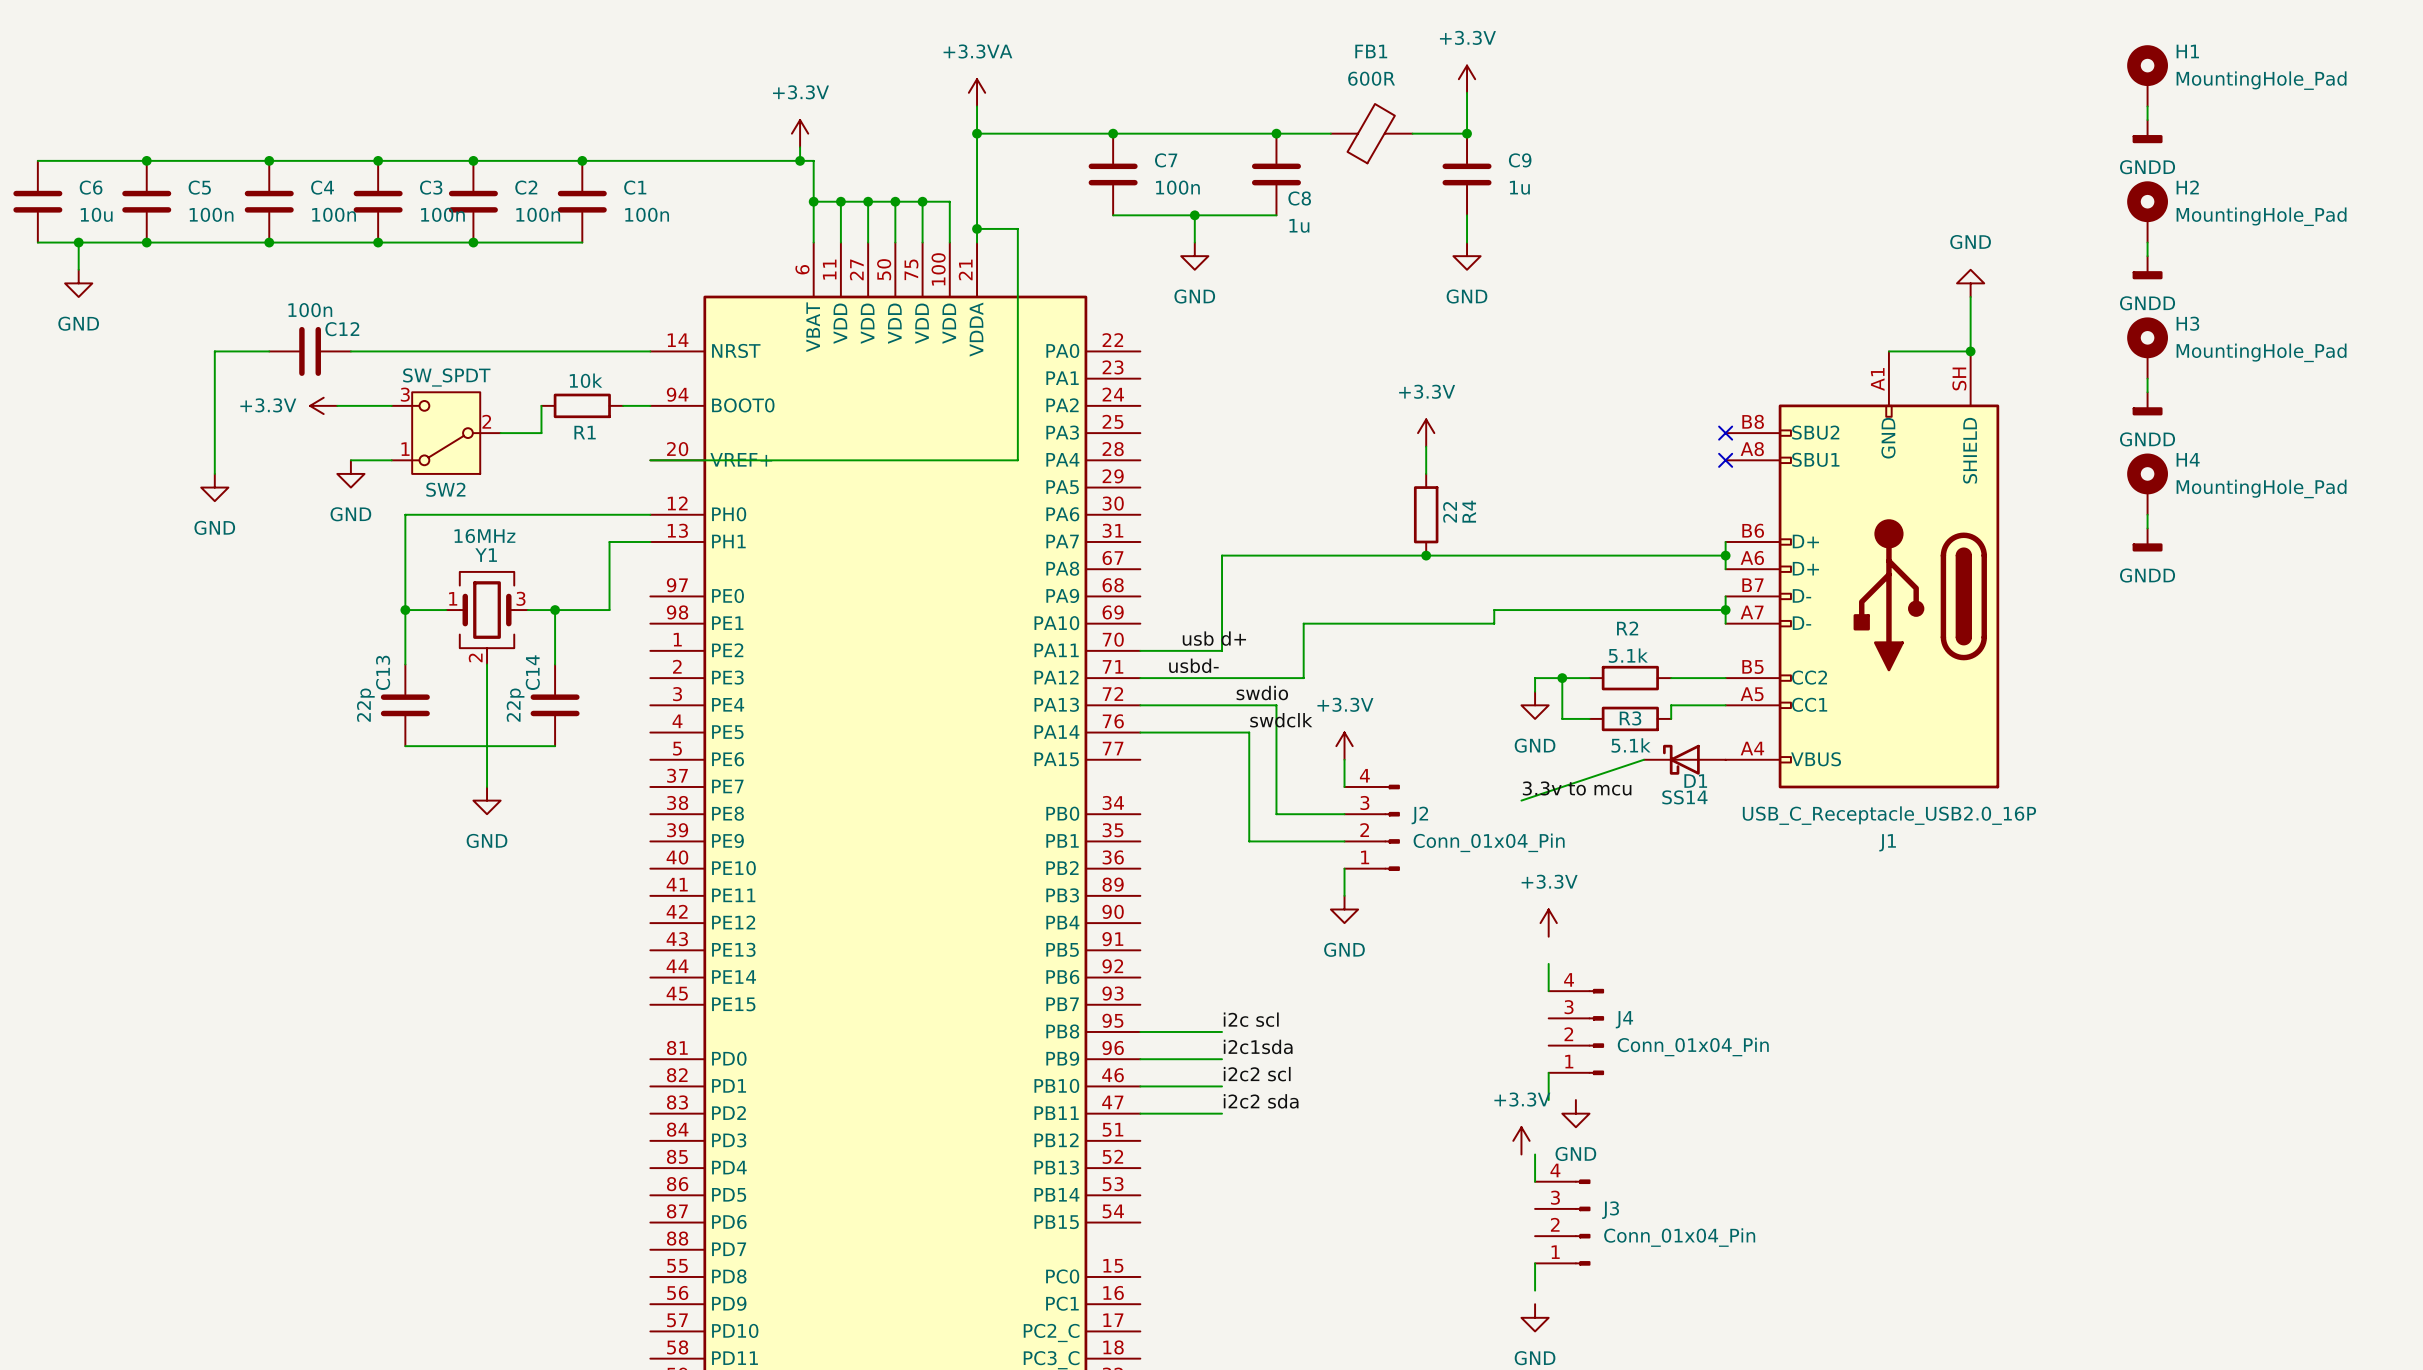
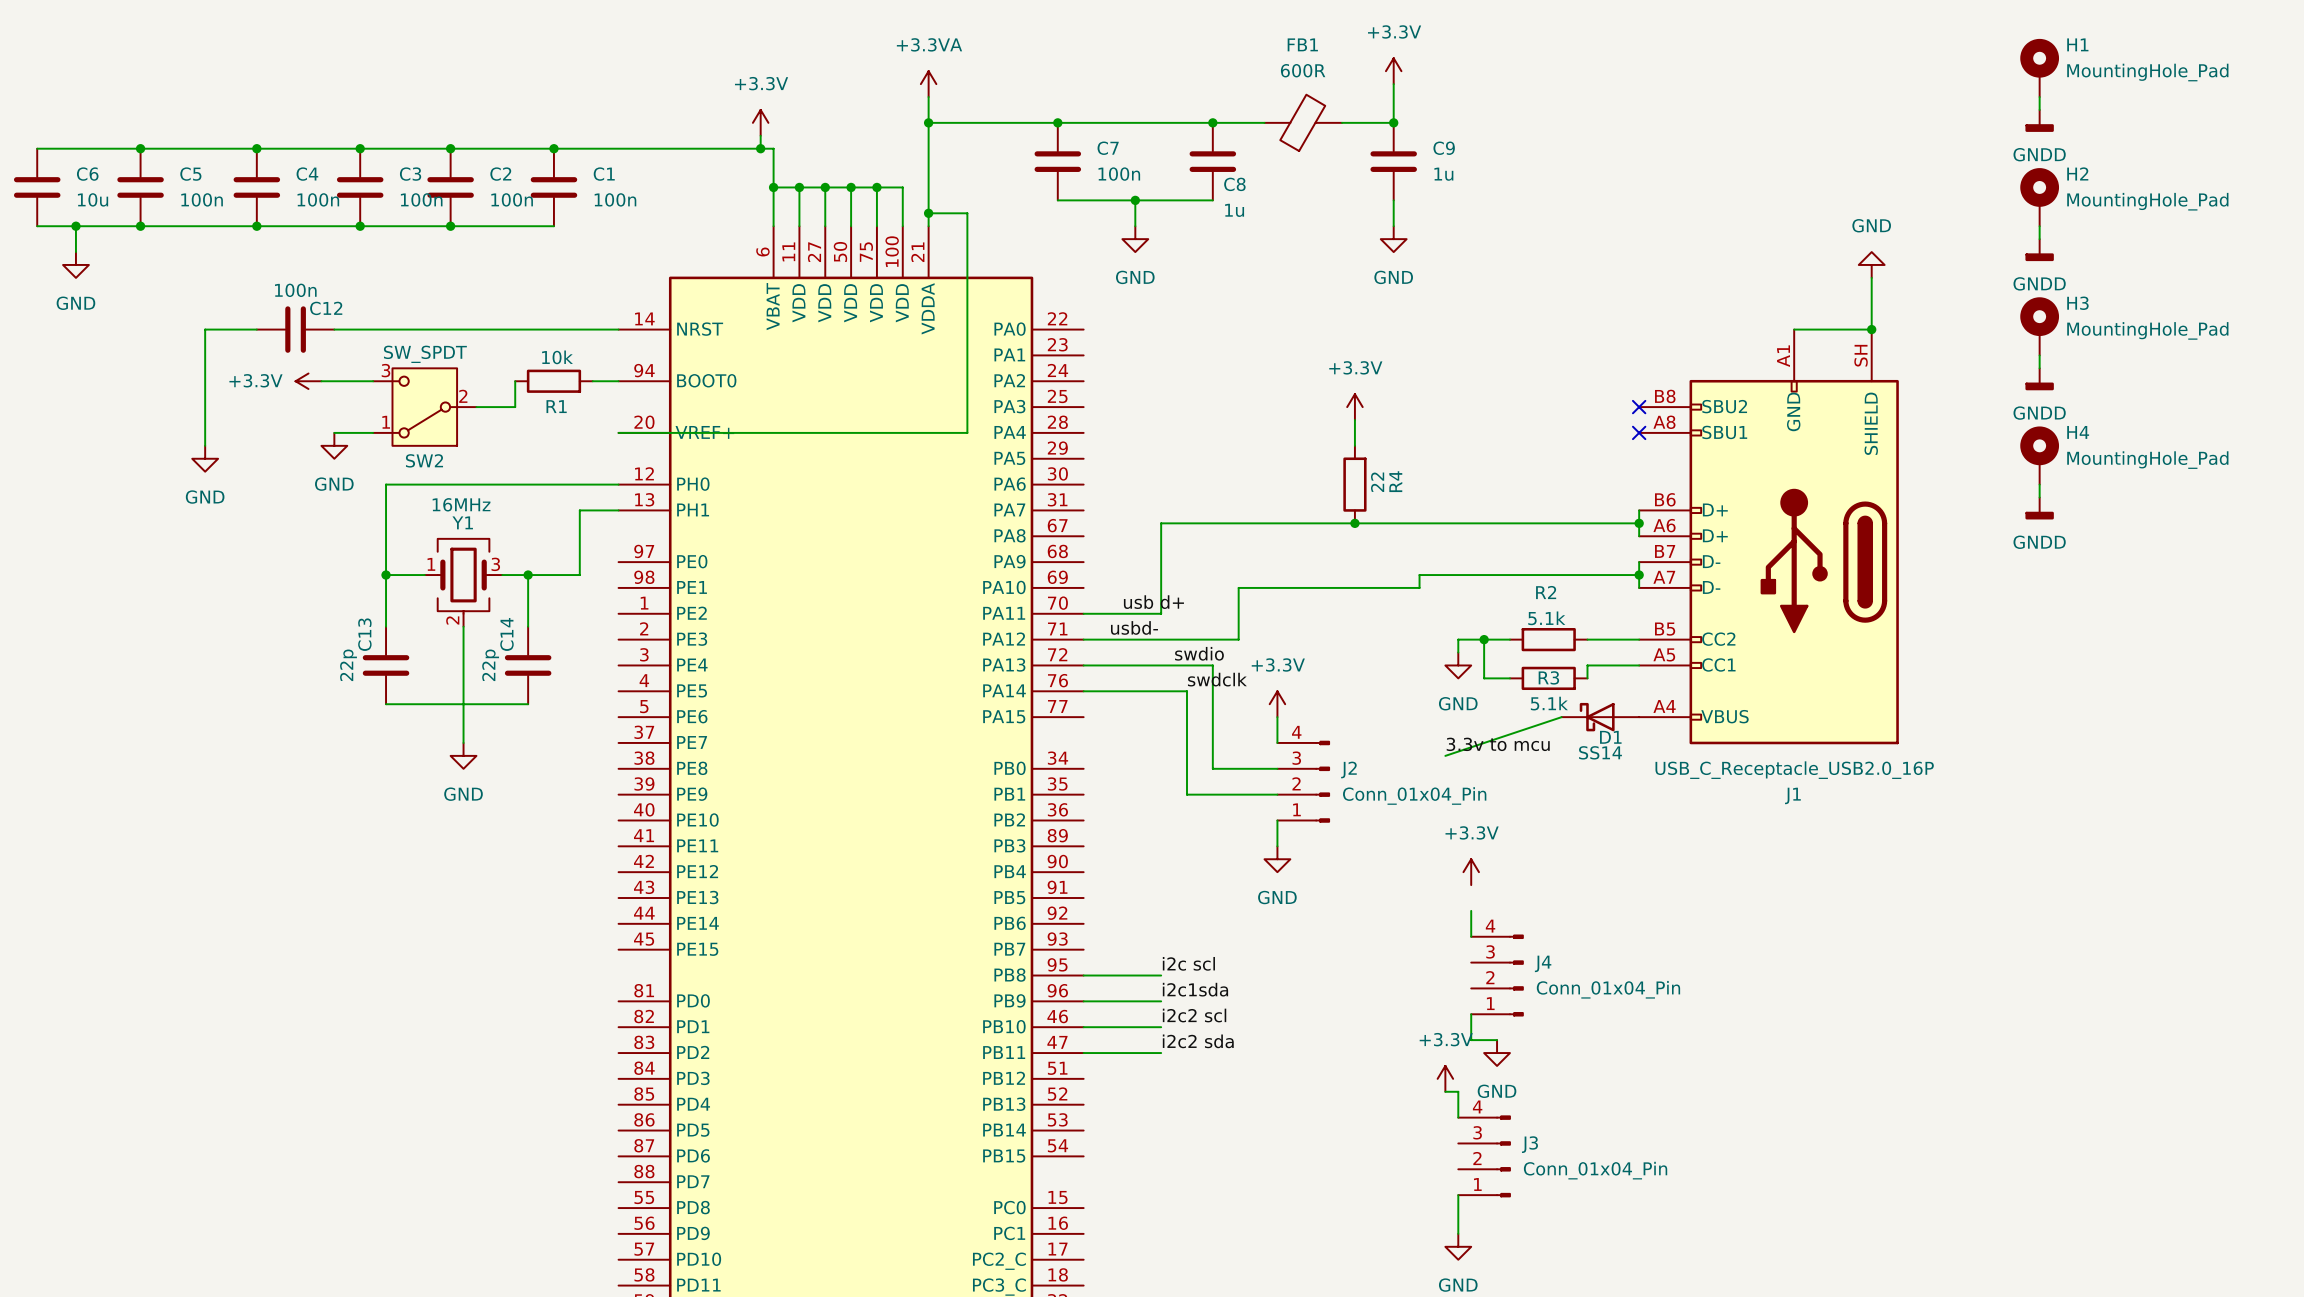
wire: none -> (1471, 1040) (1497, 1040)
wire: none -> (1445, 1091) (1458, 1091)
wire: none -> (1458, 1220) (1458, 1233)

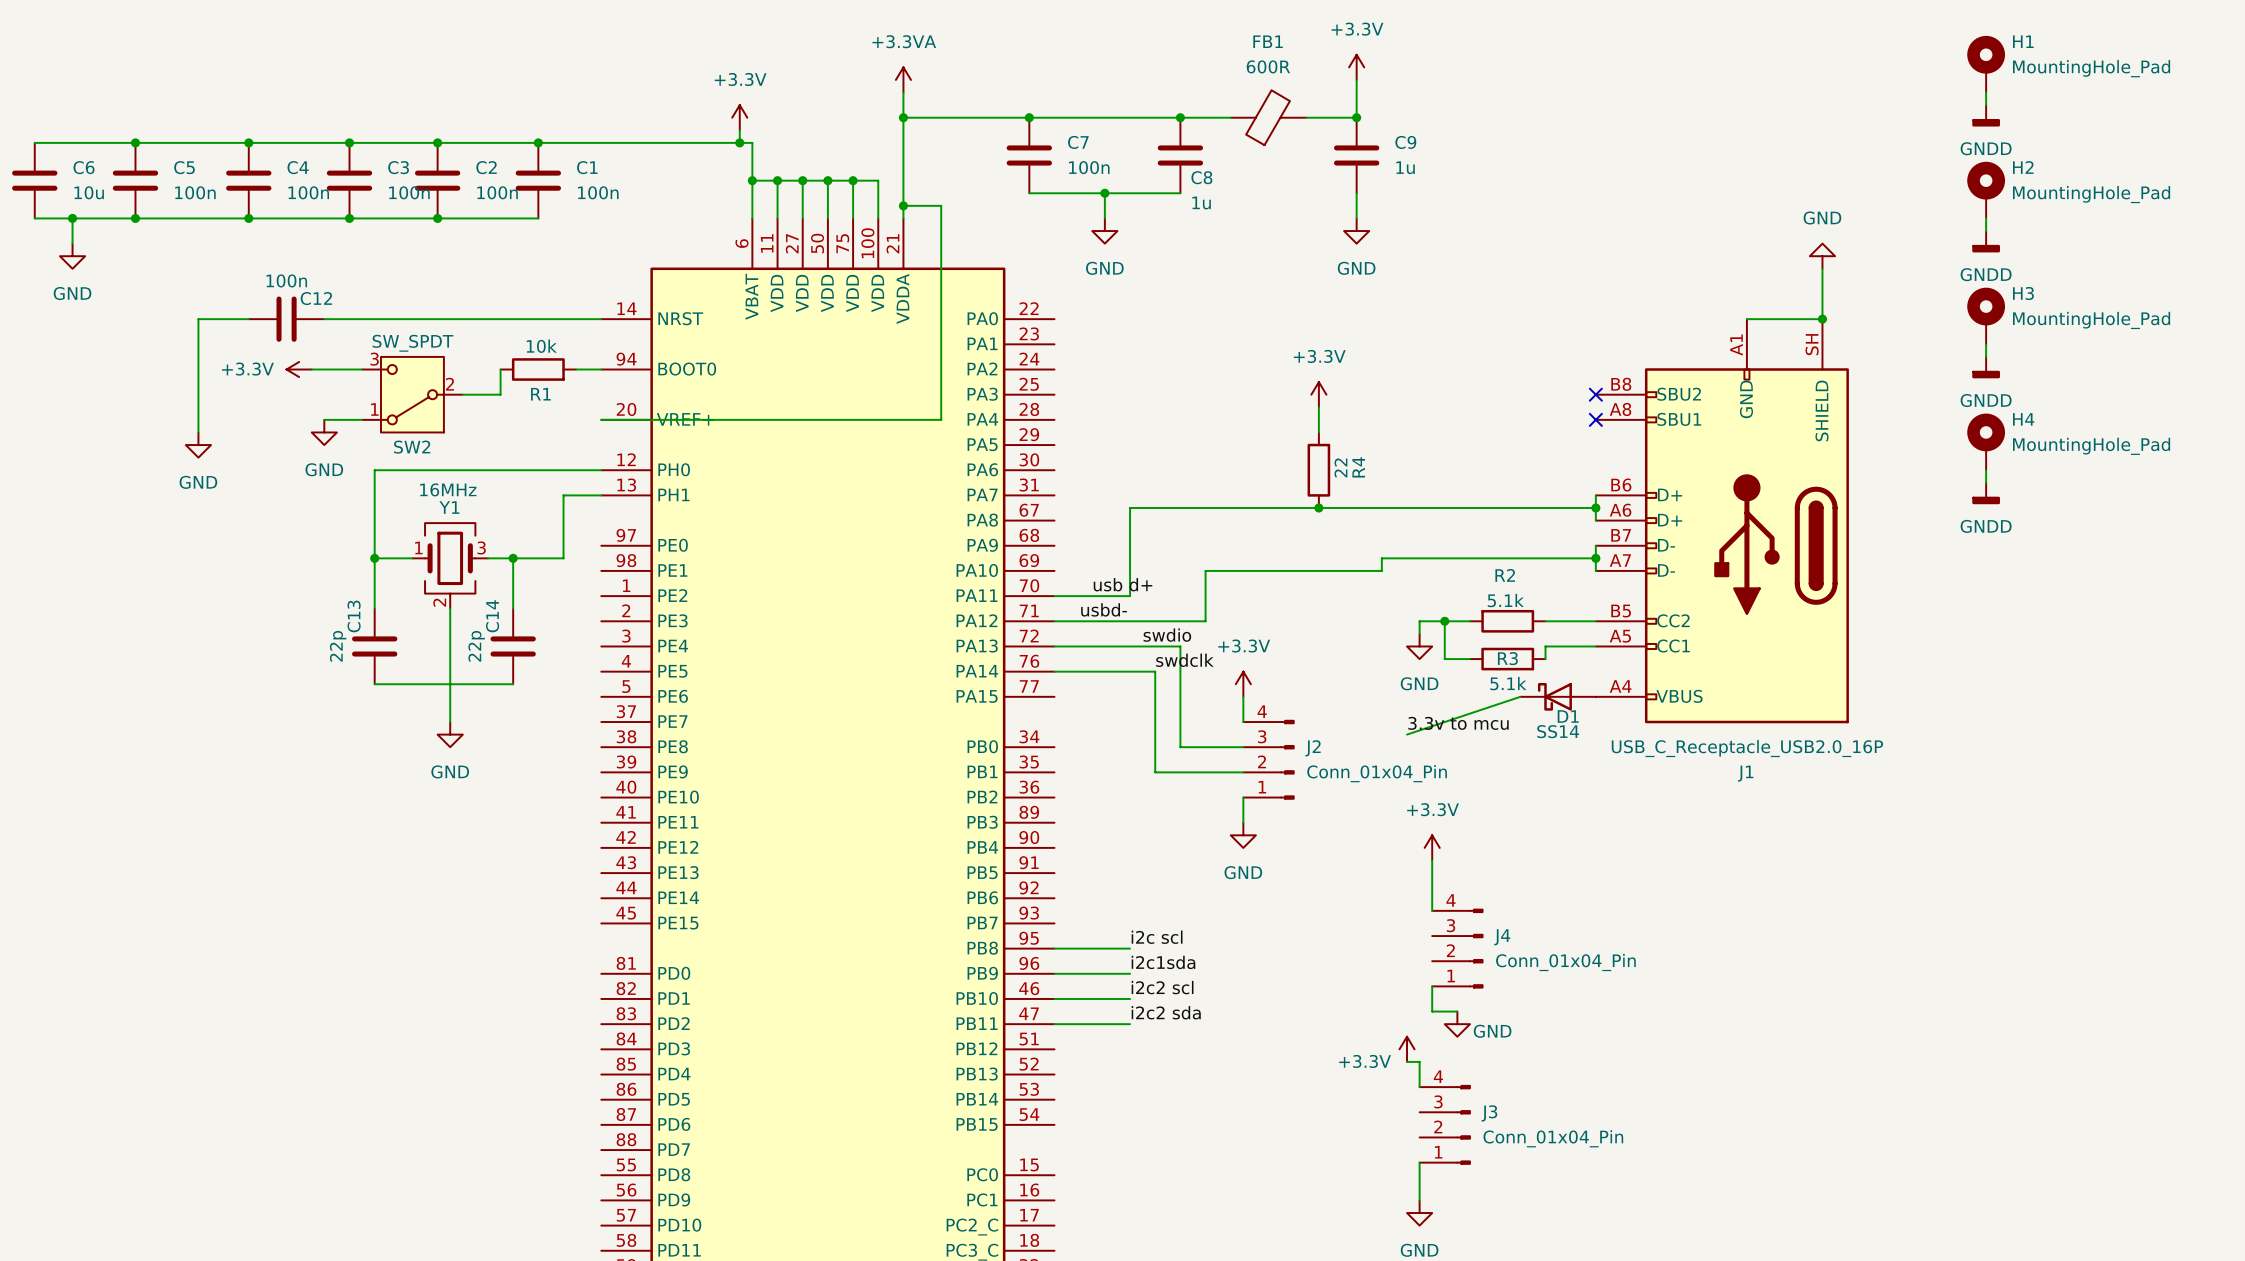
wire: none -> (1432, 860) (1432, 885)
power symbol text position: +3.3V (1446, 1039) -> +3.3V (1365, 1061)
power symbol text position: GND (1497, 1091) -> GND (1492, 1031)

